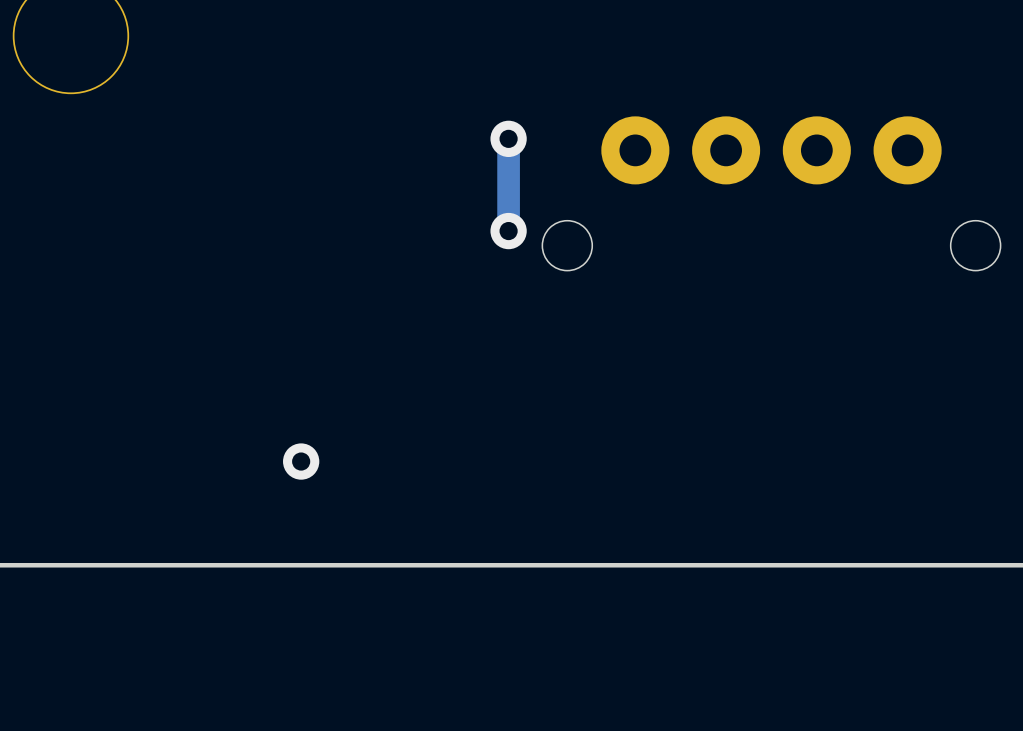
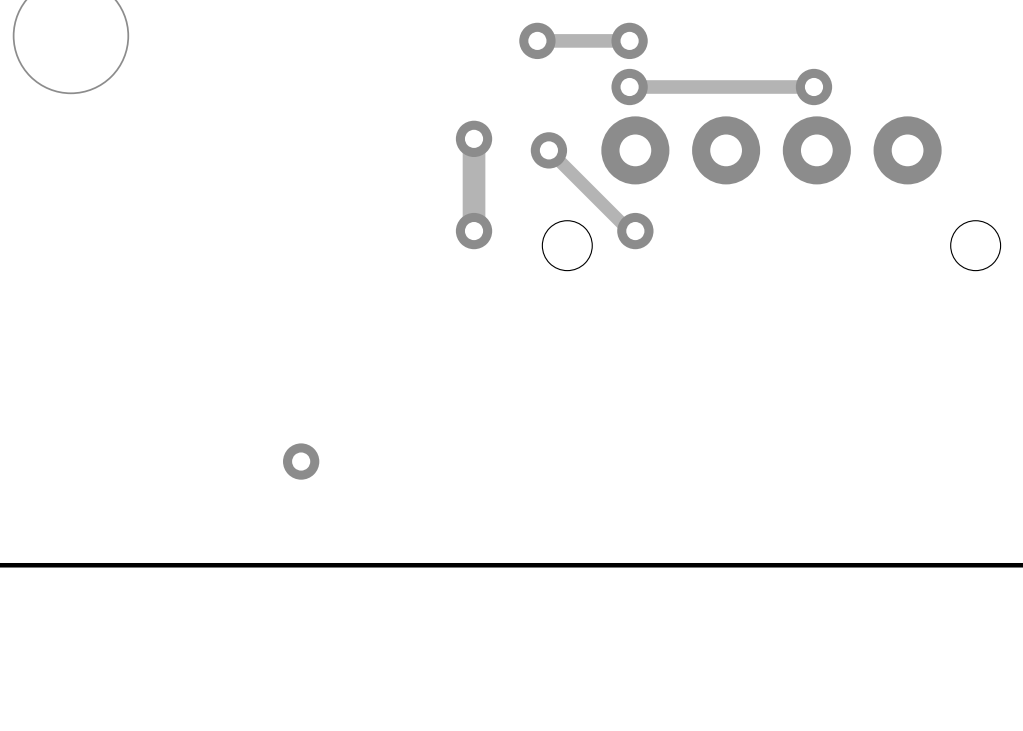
via: none -> (537, 40)
track: none -> (629, 40) (537, 40)
via: none -> (629, 40)
via: none -> (629, 87)
track: none -> (813, 87) (629, 87)
via: none -> (813, 87)
track: (508, 138) (508, 231) -> (474, 138) (474, 231)
via position: (508, 138) -> (474, 138)
track: none -> (548, 150) (629, 231) (635, 231)
via: none -> (548, 150)
via position: (508, 231) -> (474, 231)
via: none -> (635, 231)

